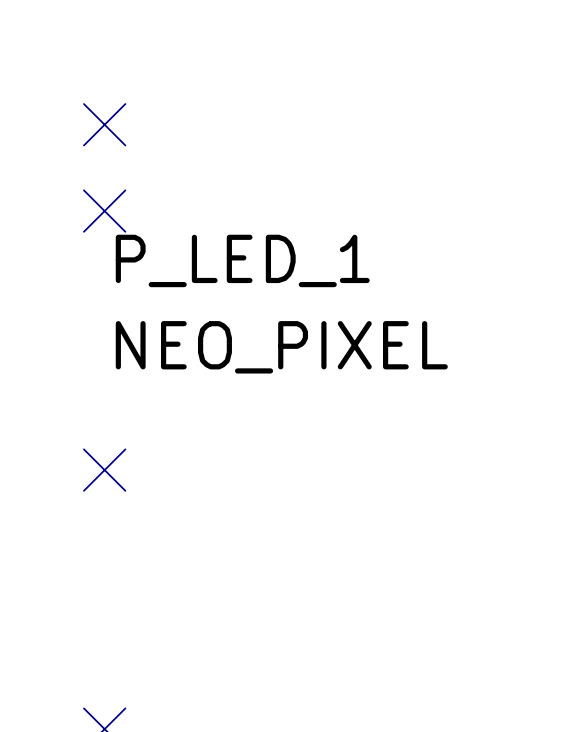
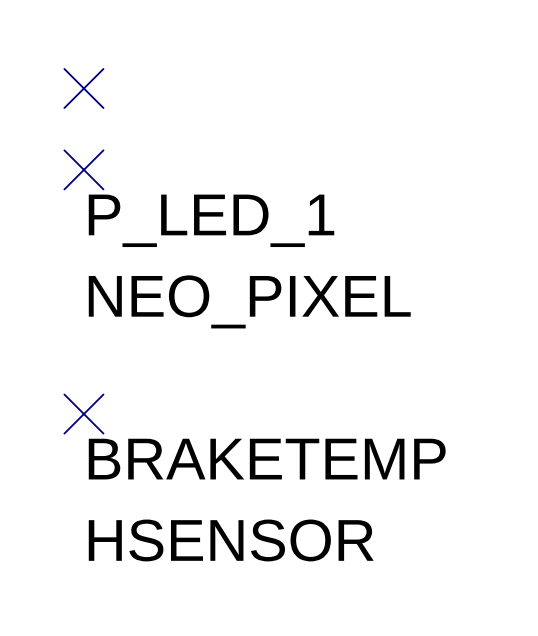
label: none -> BRAKETEMP (267, 459)
label: none -> HSENSOR (231, 540)

